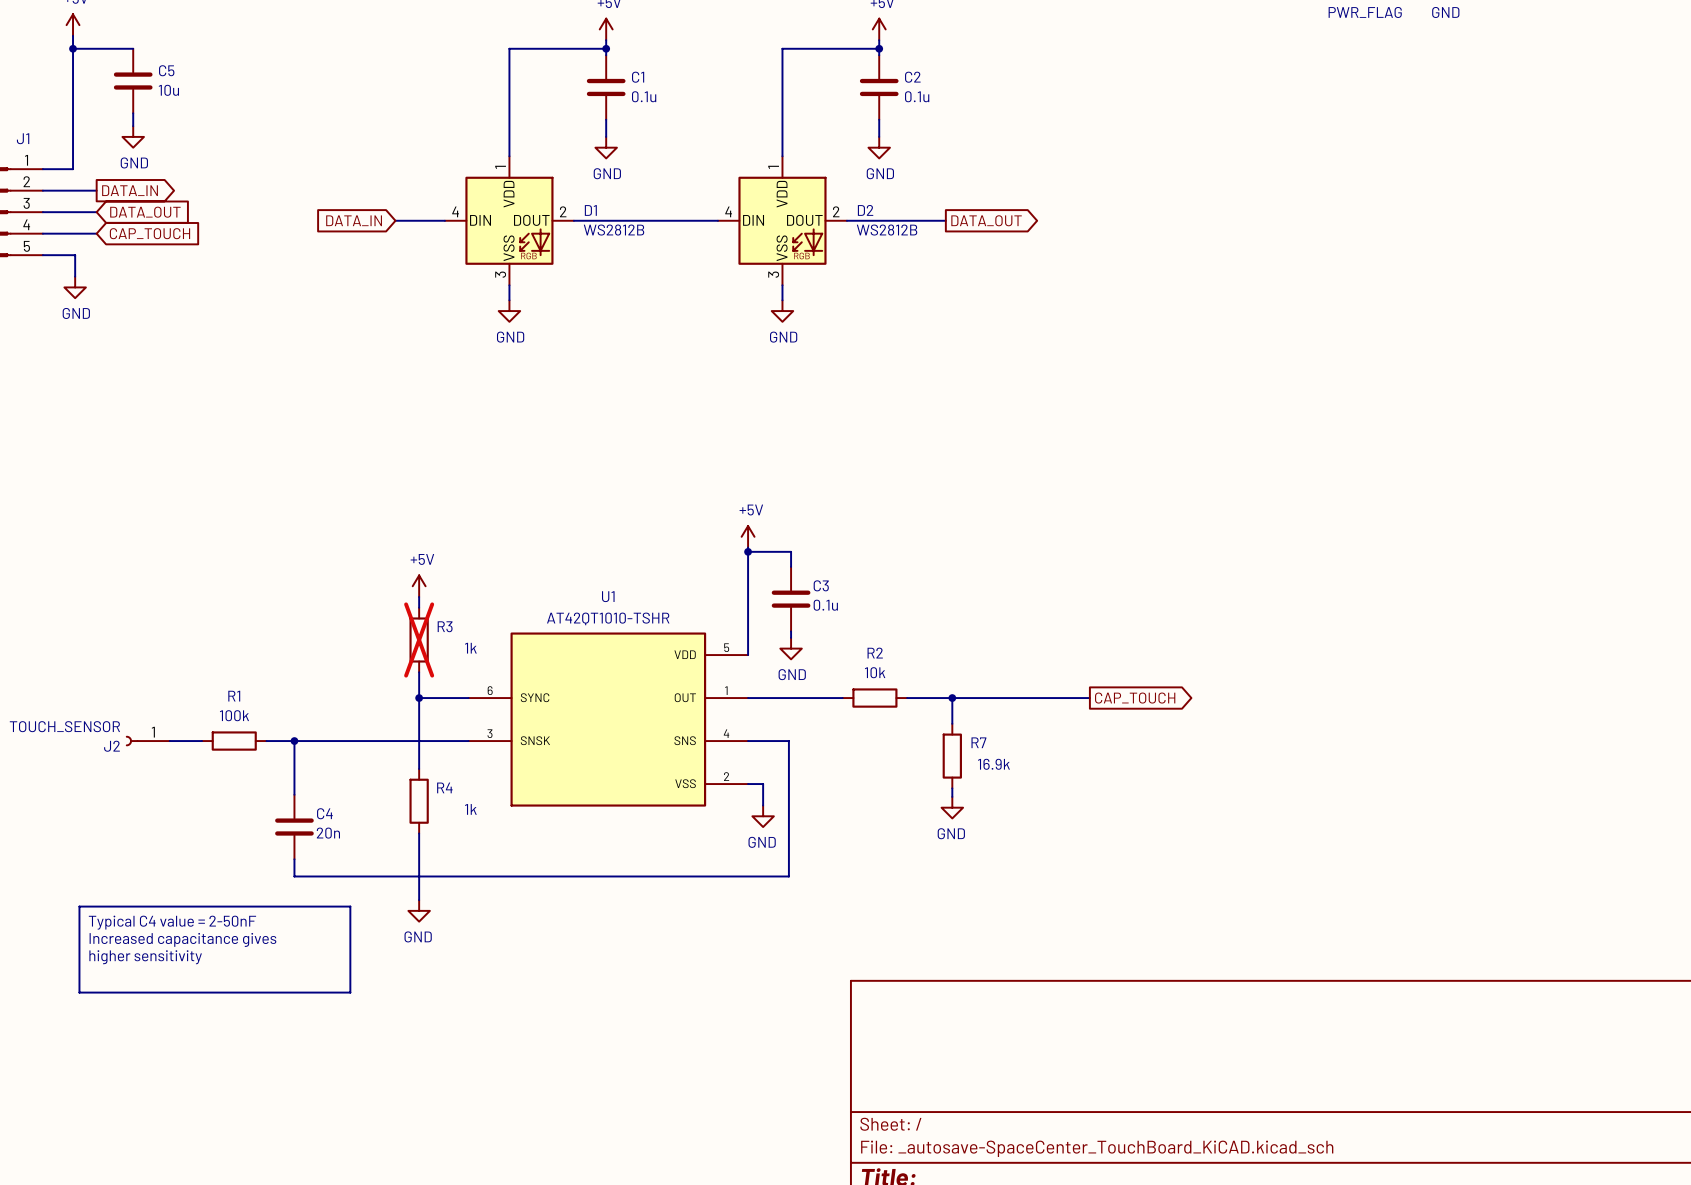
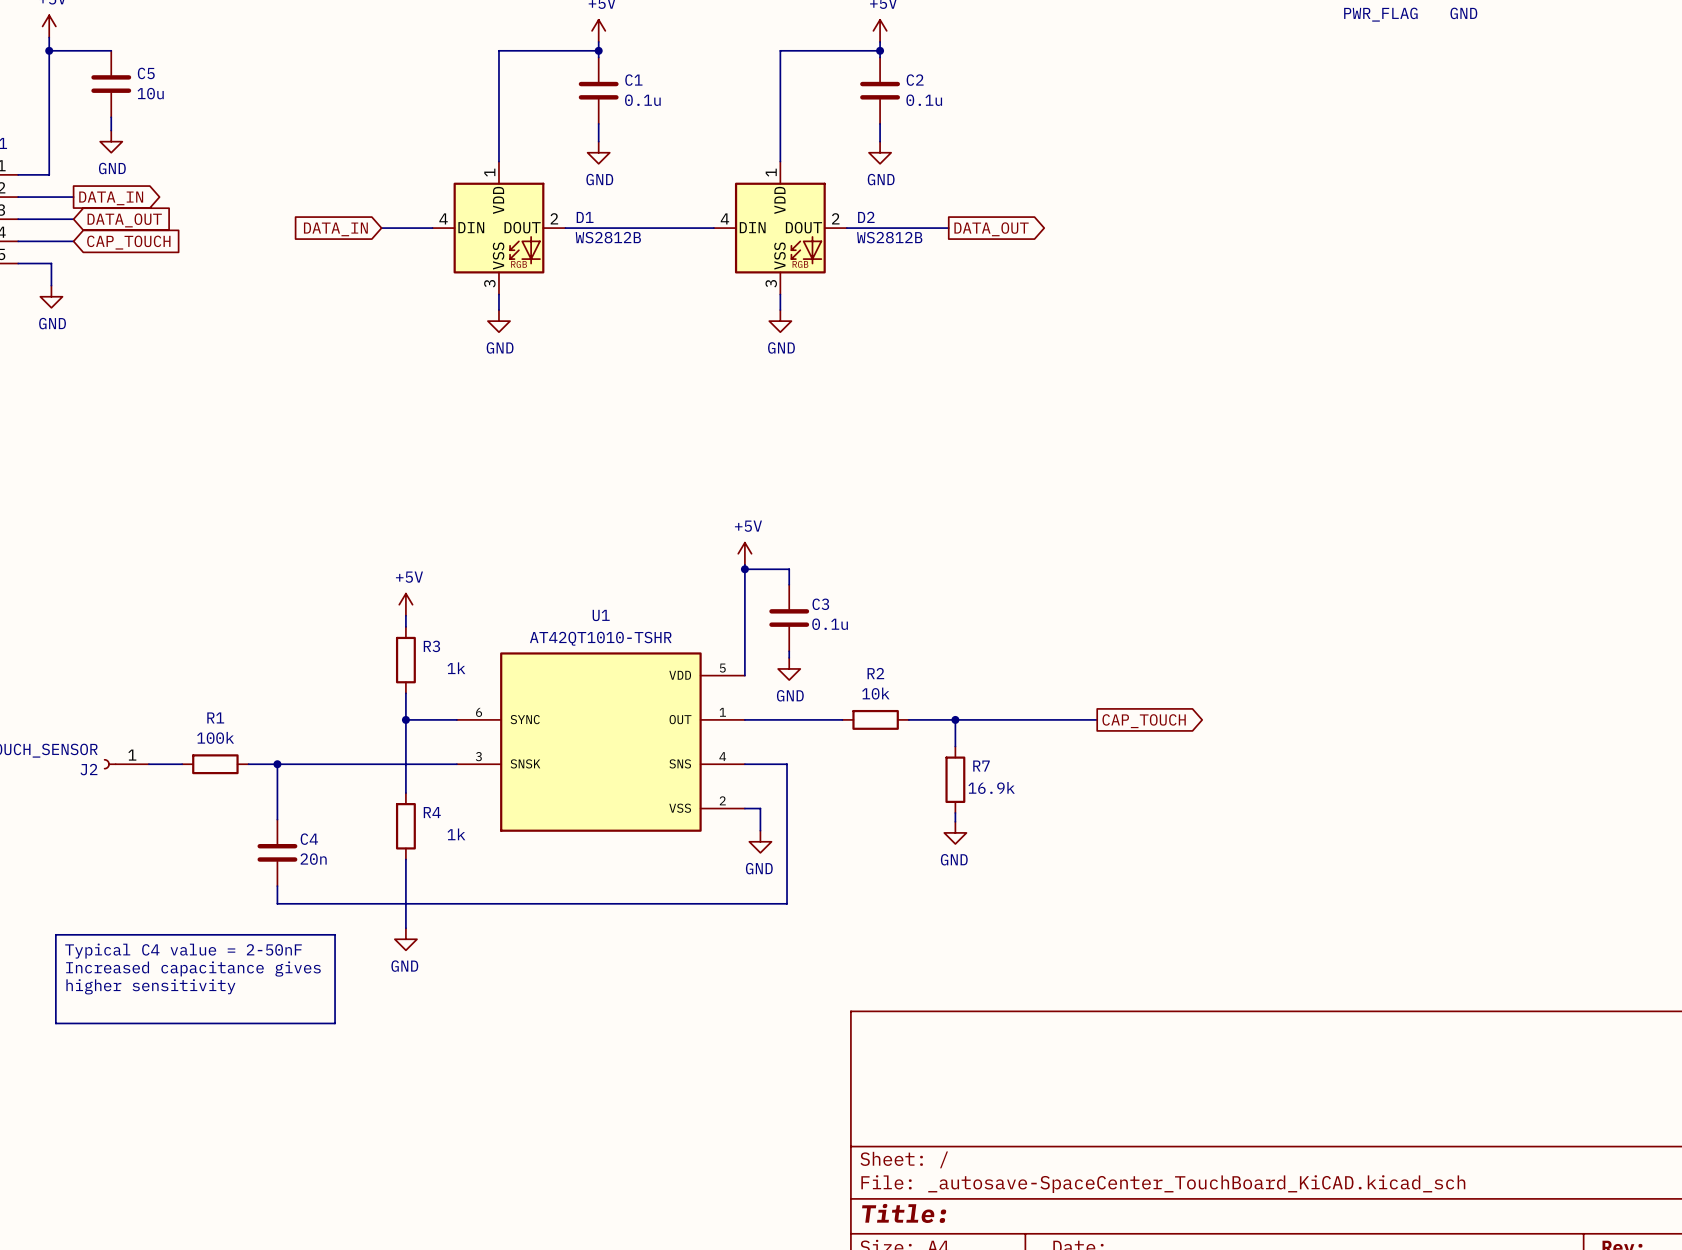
R3 do-not-place cross: (419, 640) -> none

